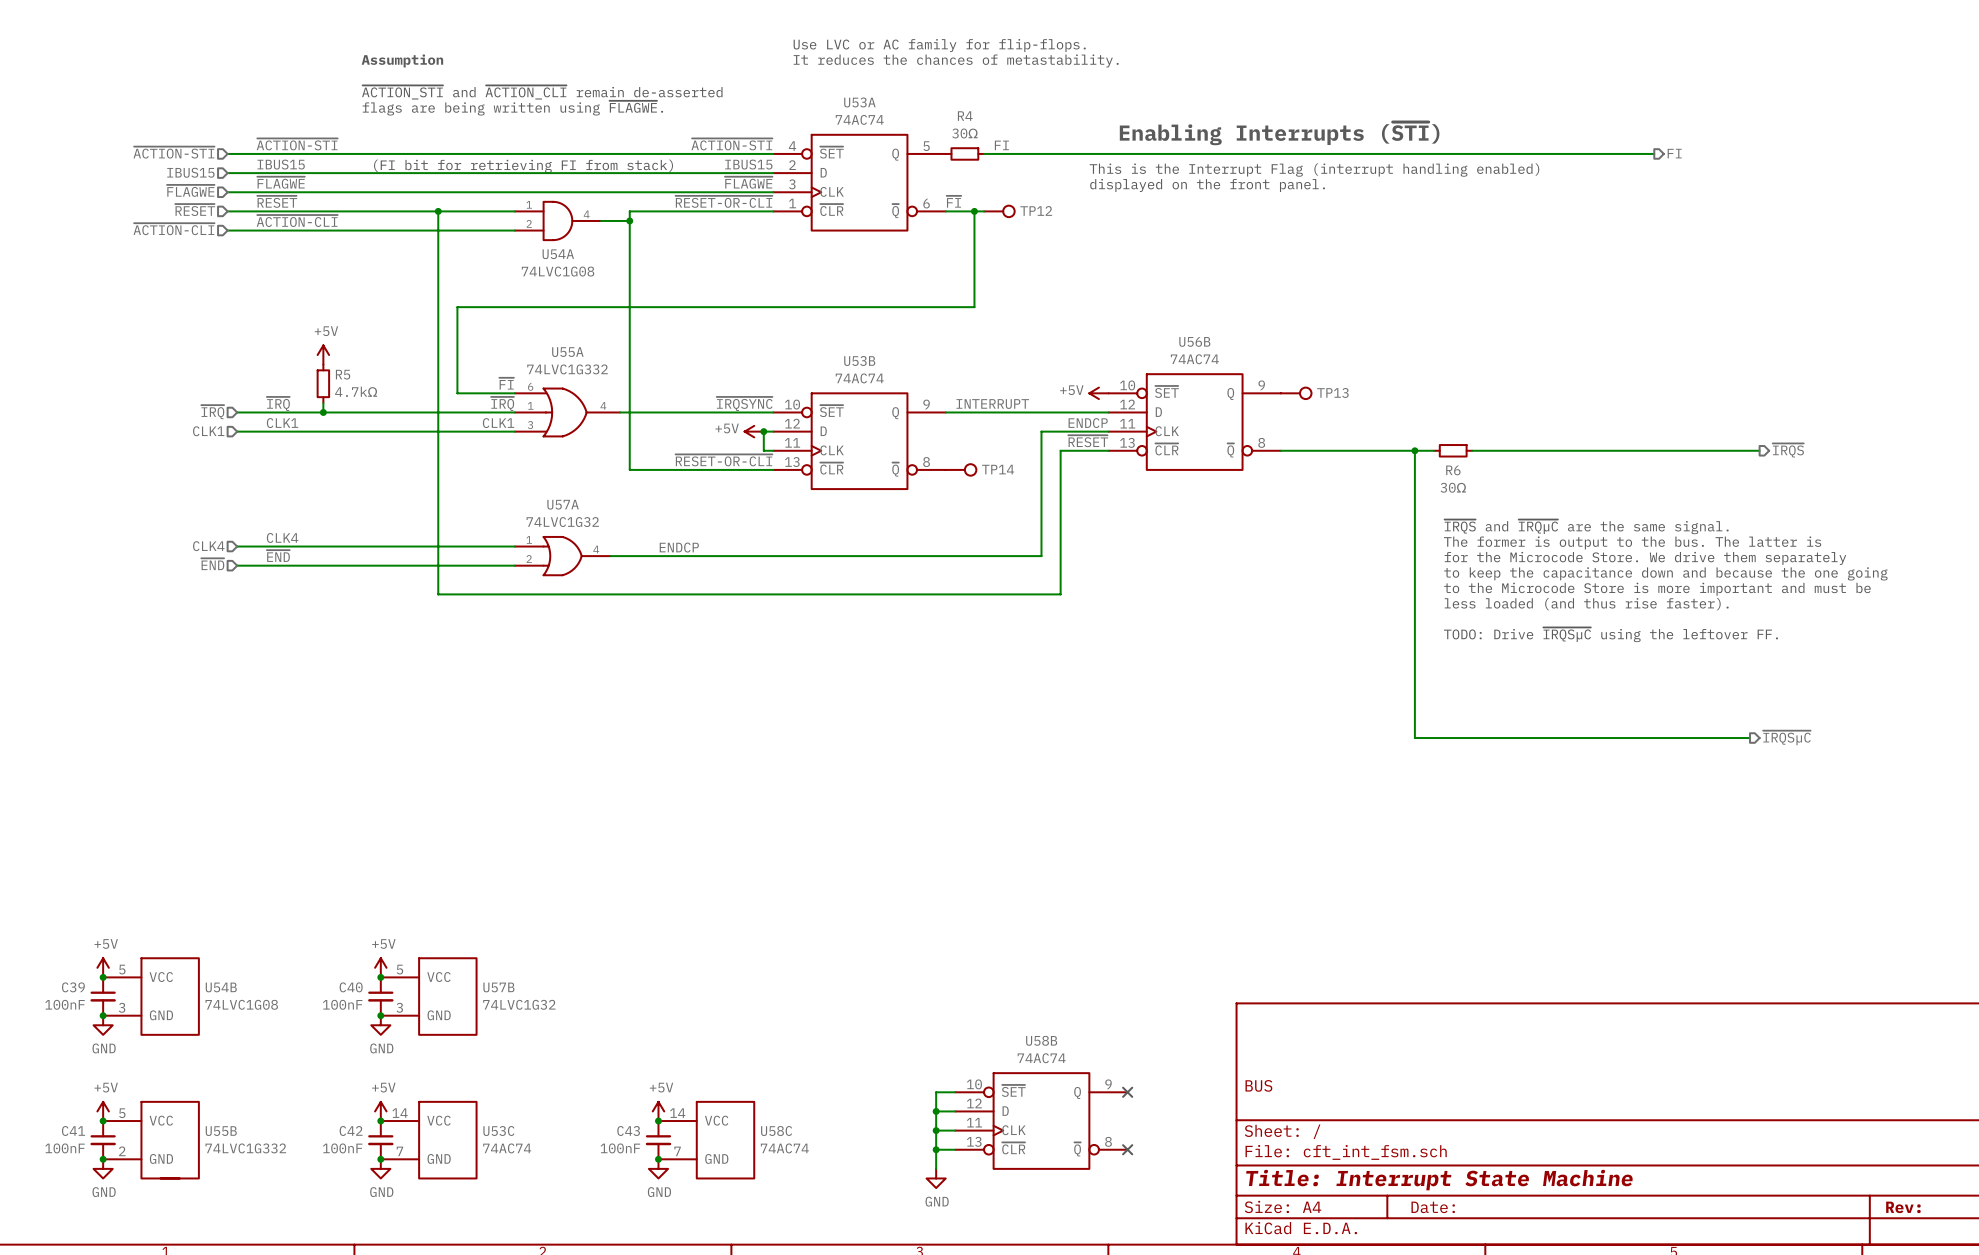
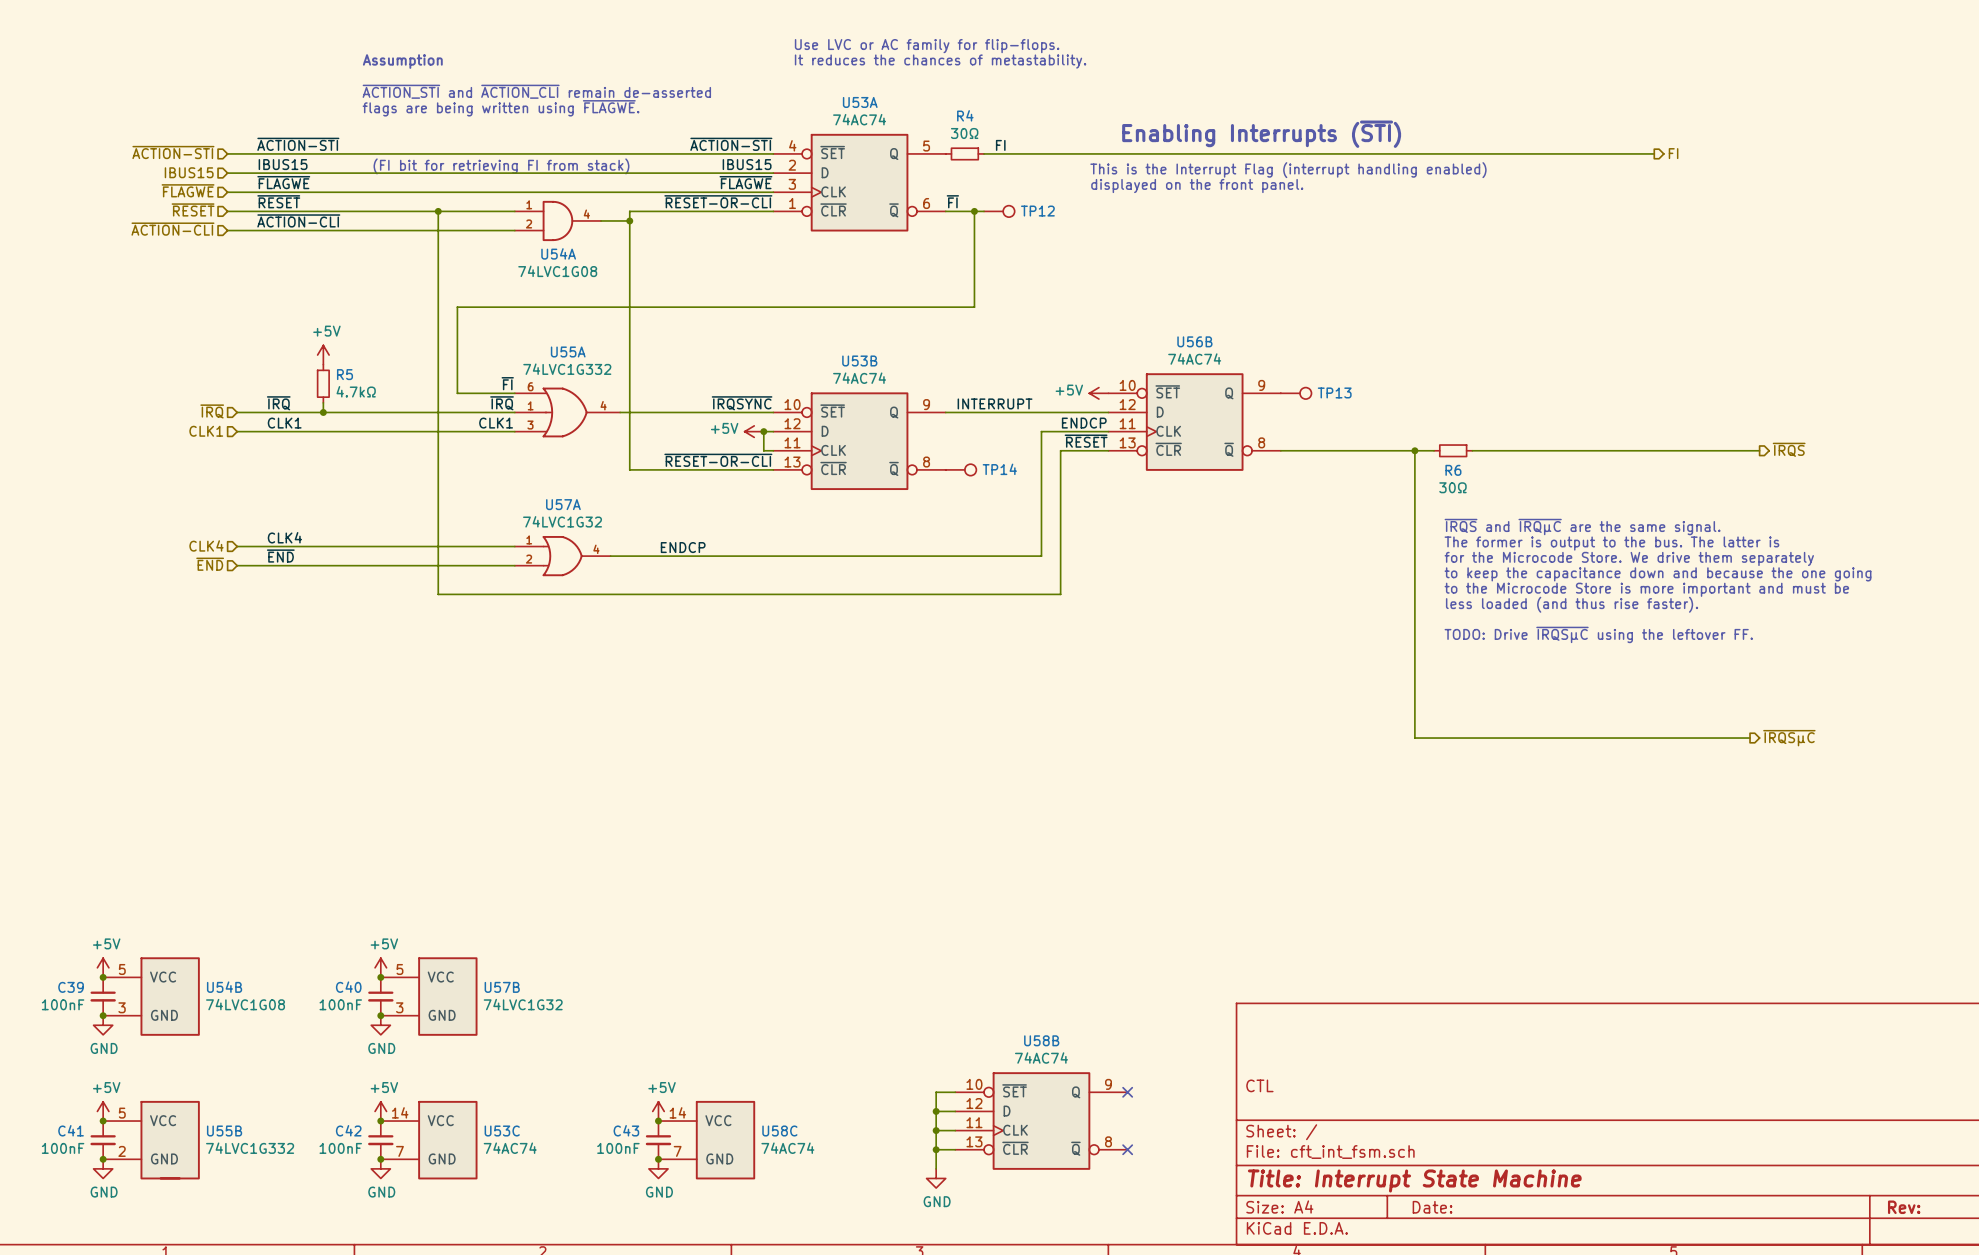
title block: BUS (1258, 1085) -> CTL (1259, 1085)

